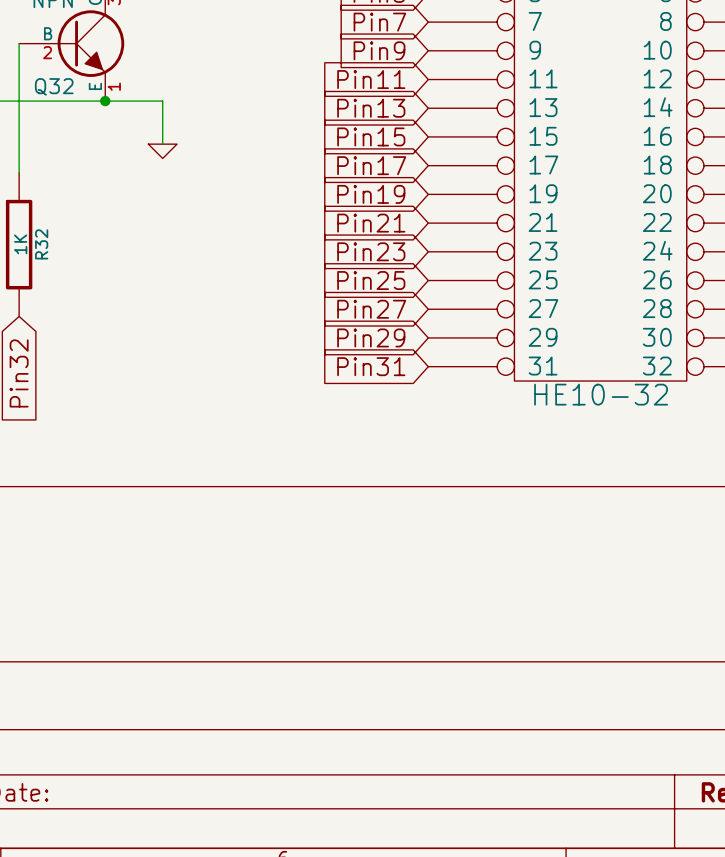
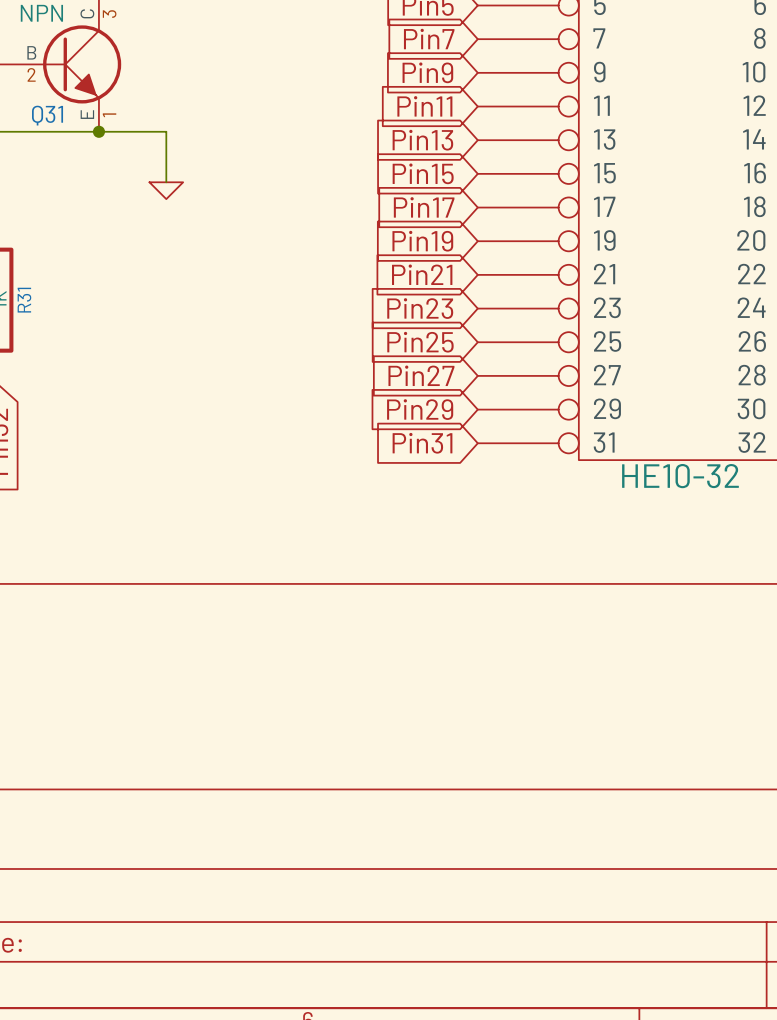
Q32 name: Q32 (54, 86) -> Q31 (47, 115)
R32 name: R32 (41, 244) -> R31 (24, 300)

